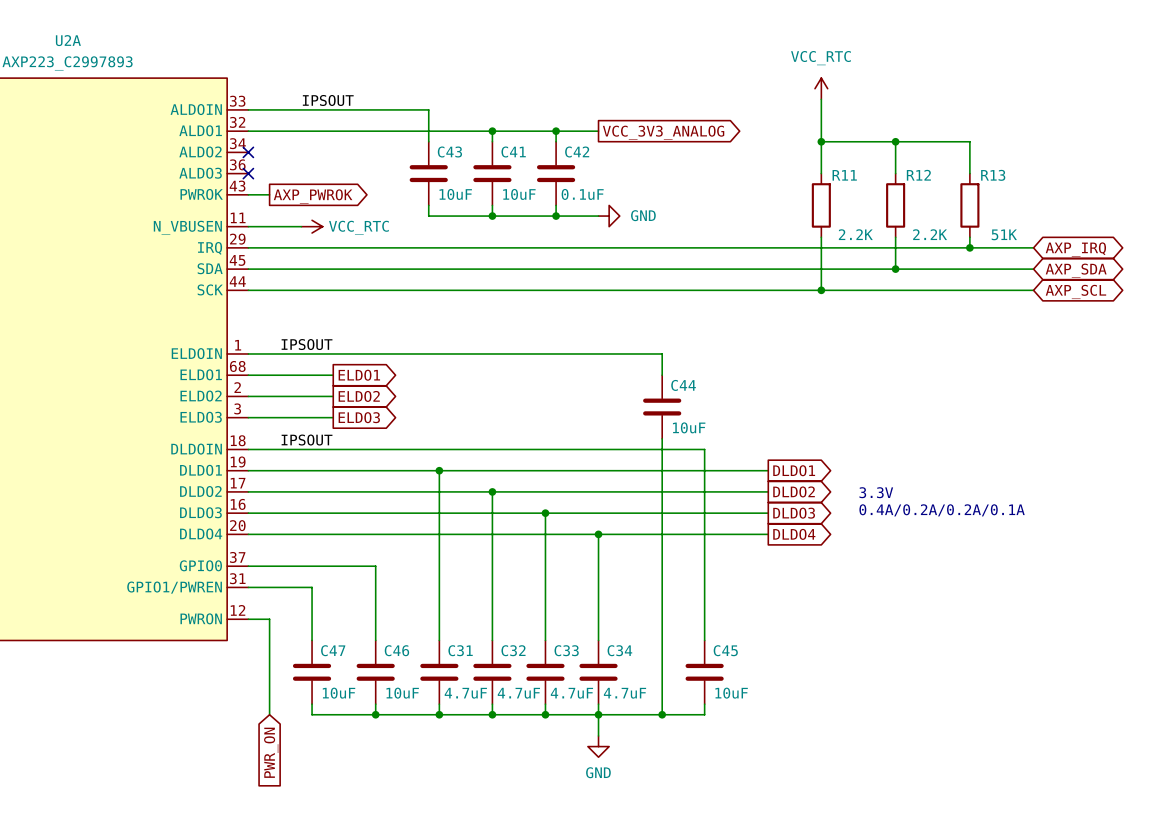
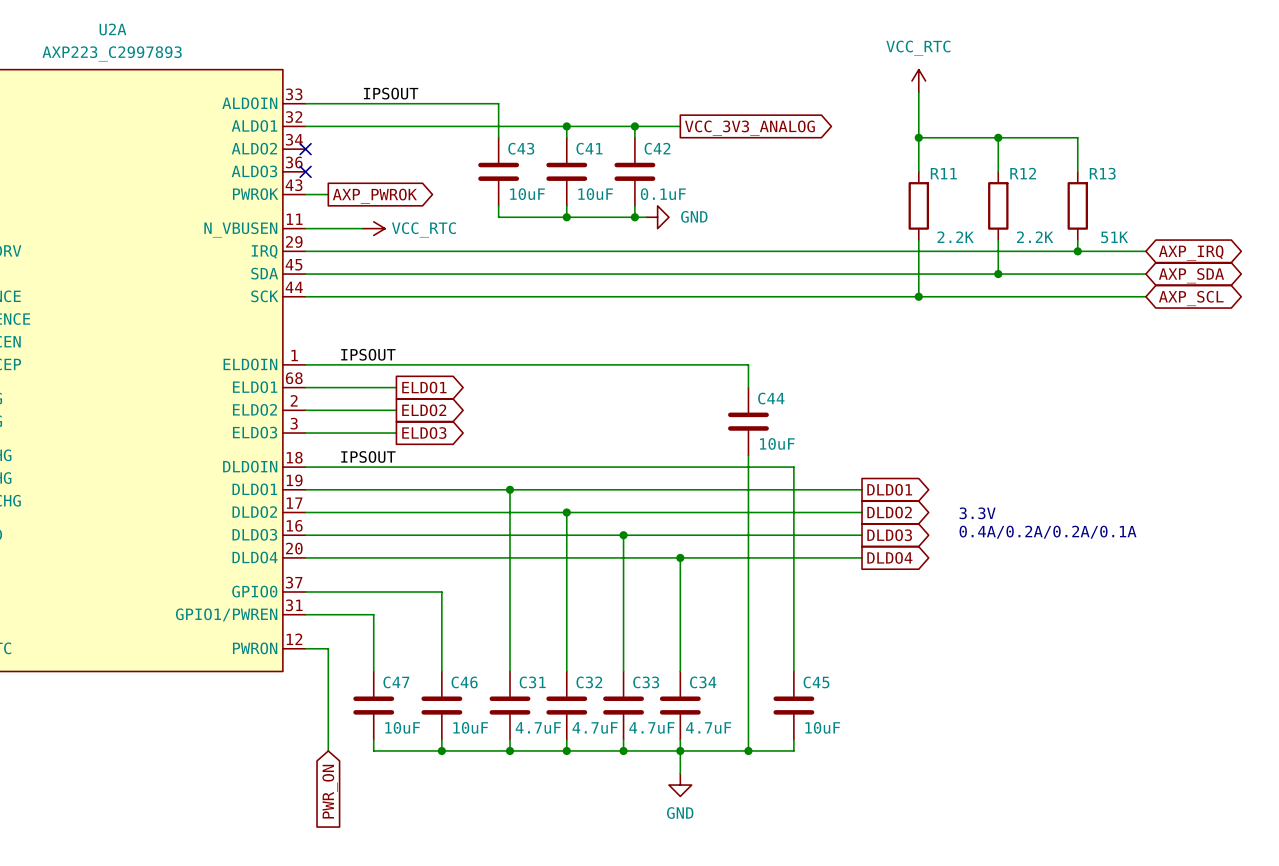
wire: (566, 216) (598, 216) -> none
power symbol position: GND (609, 216) -> GND (657, 217)

